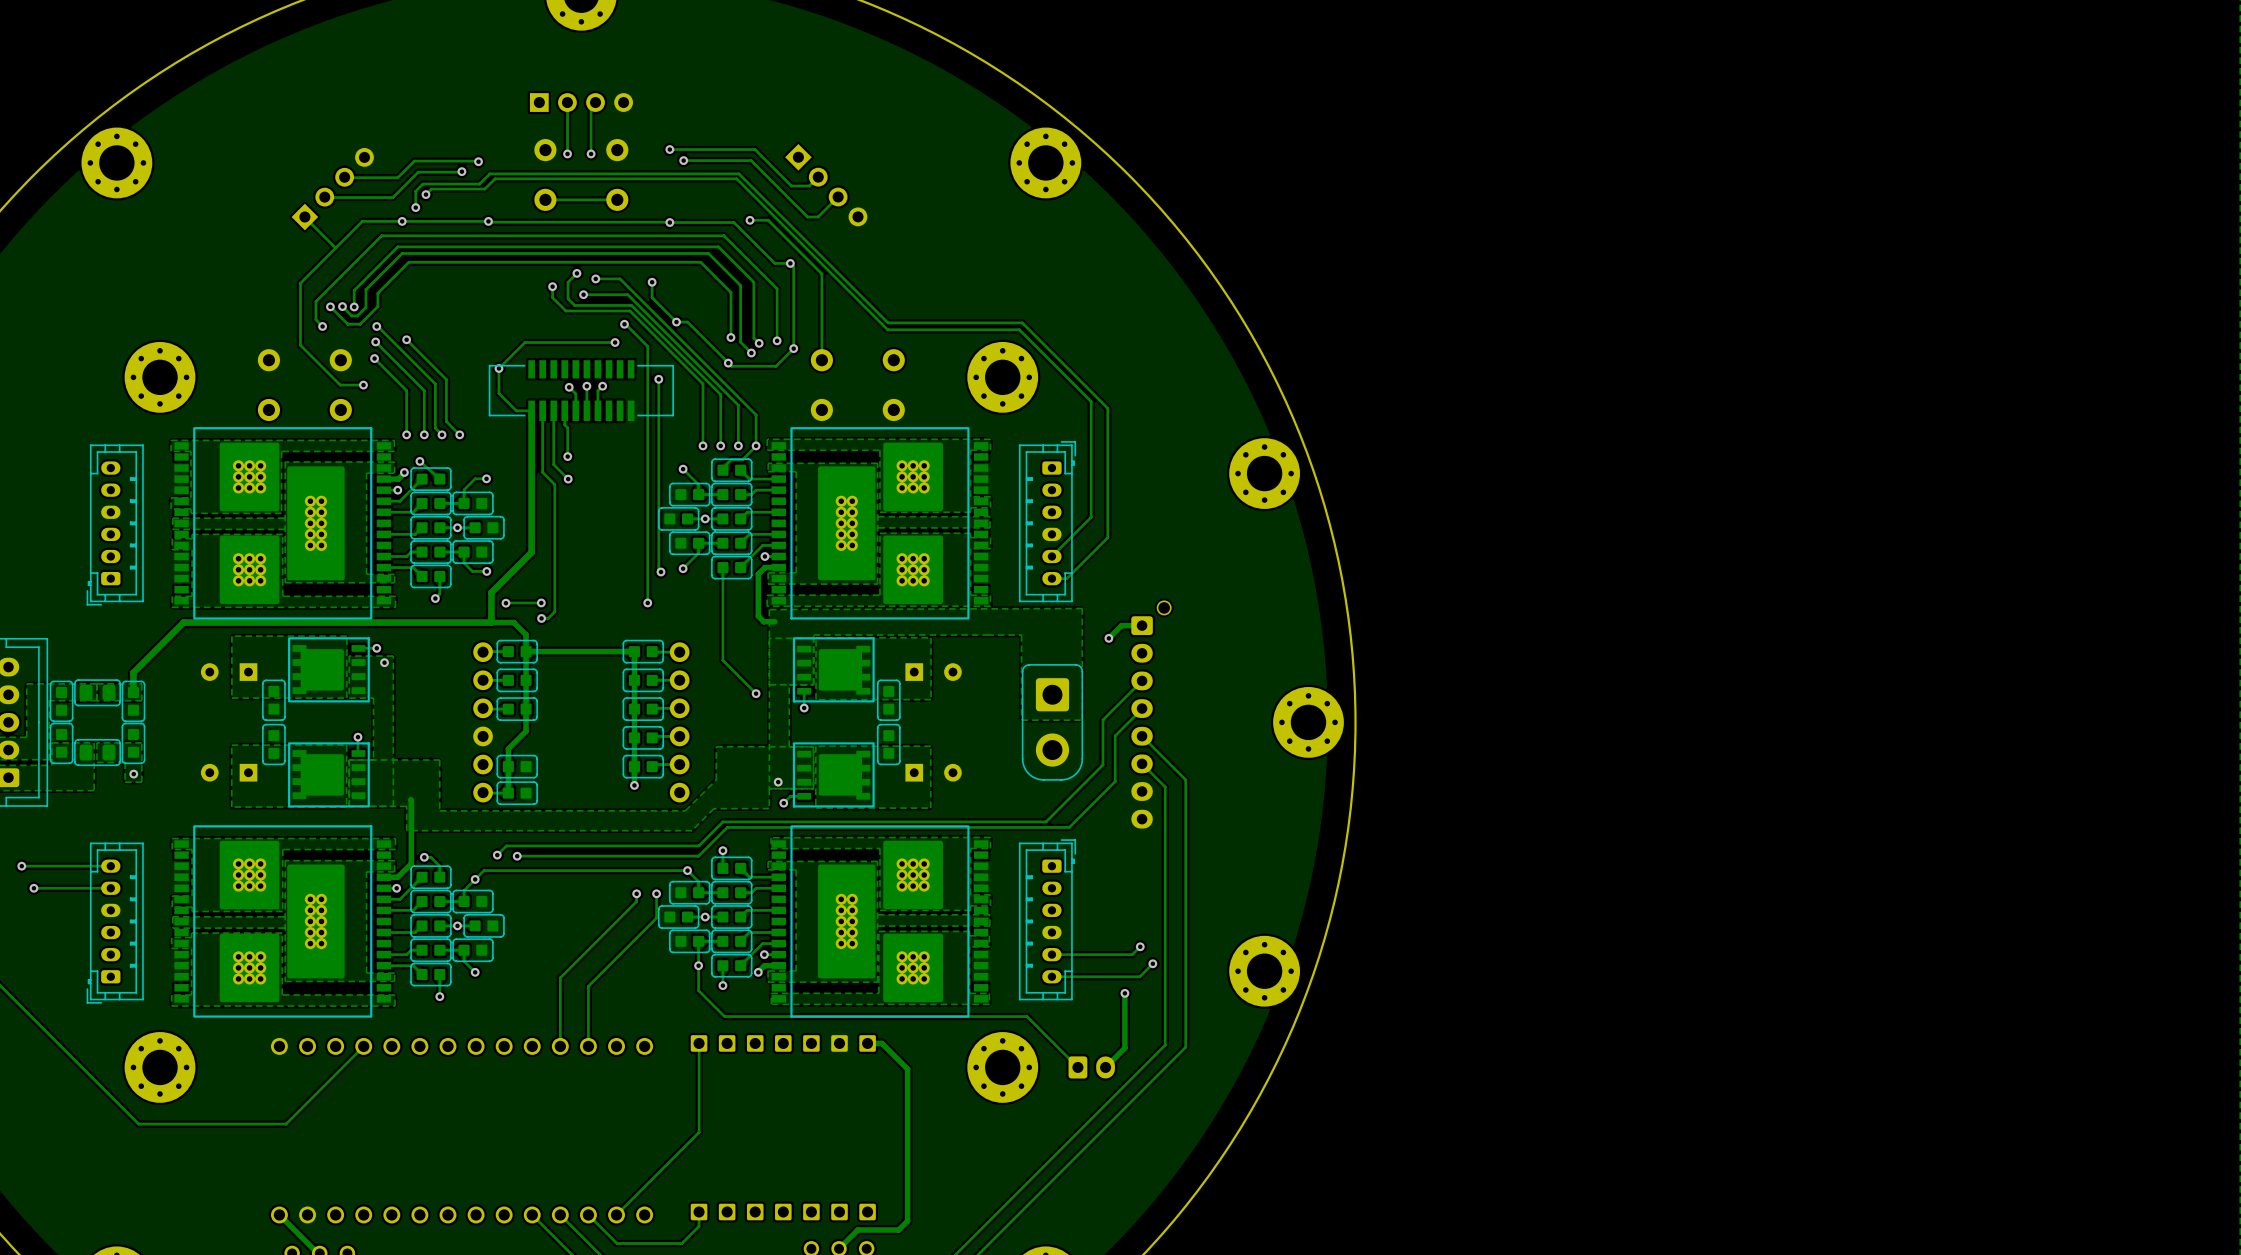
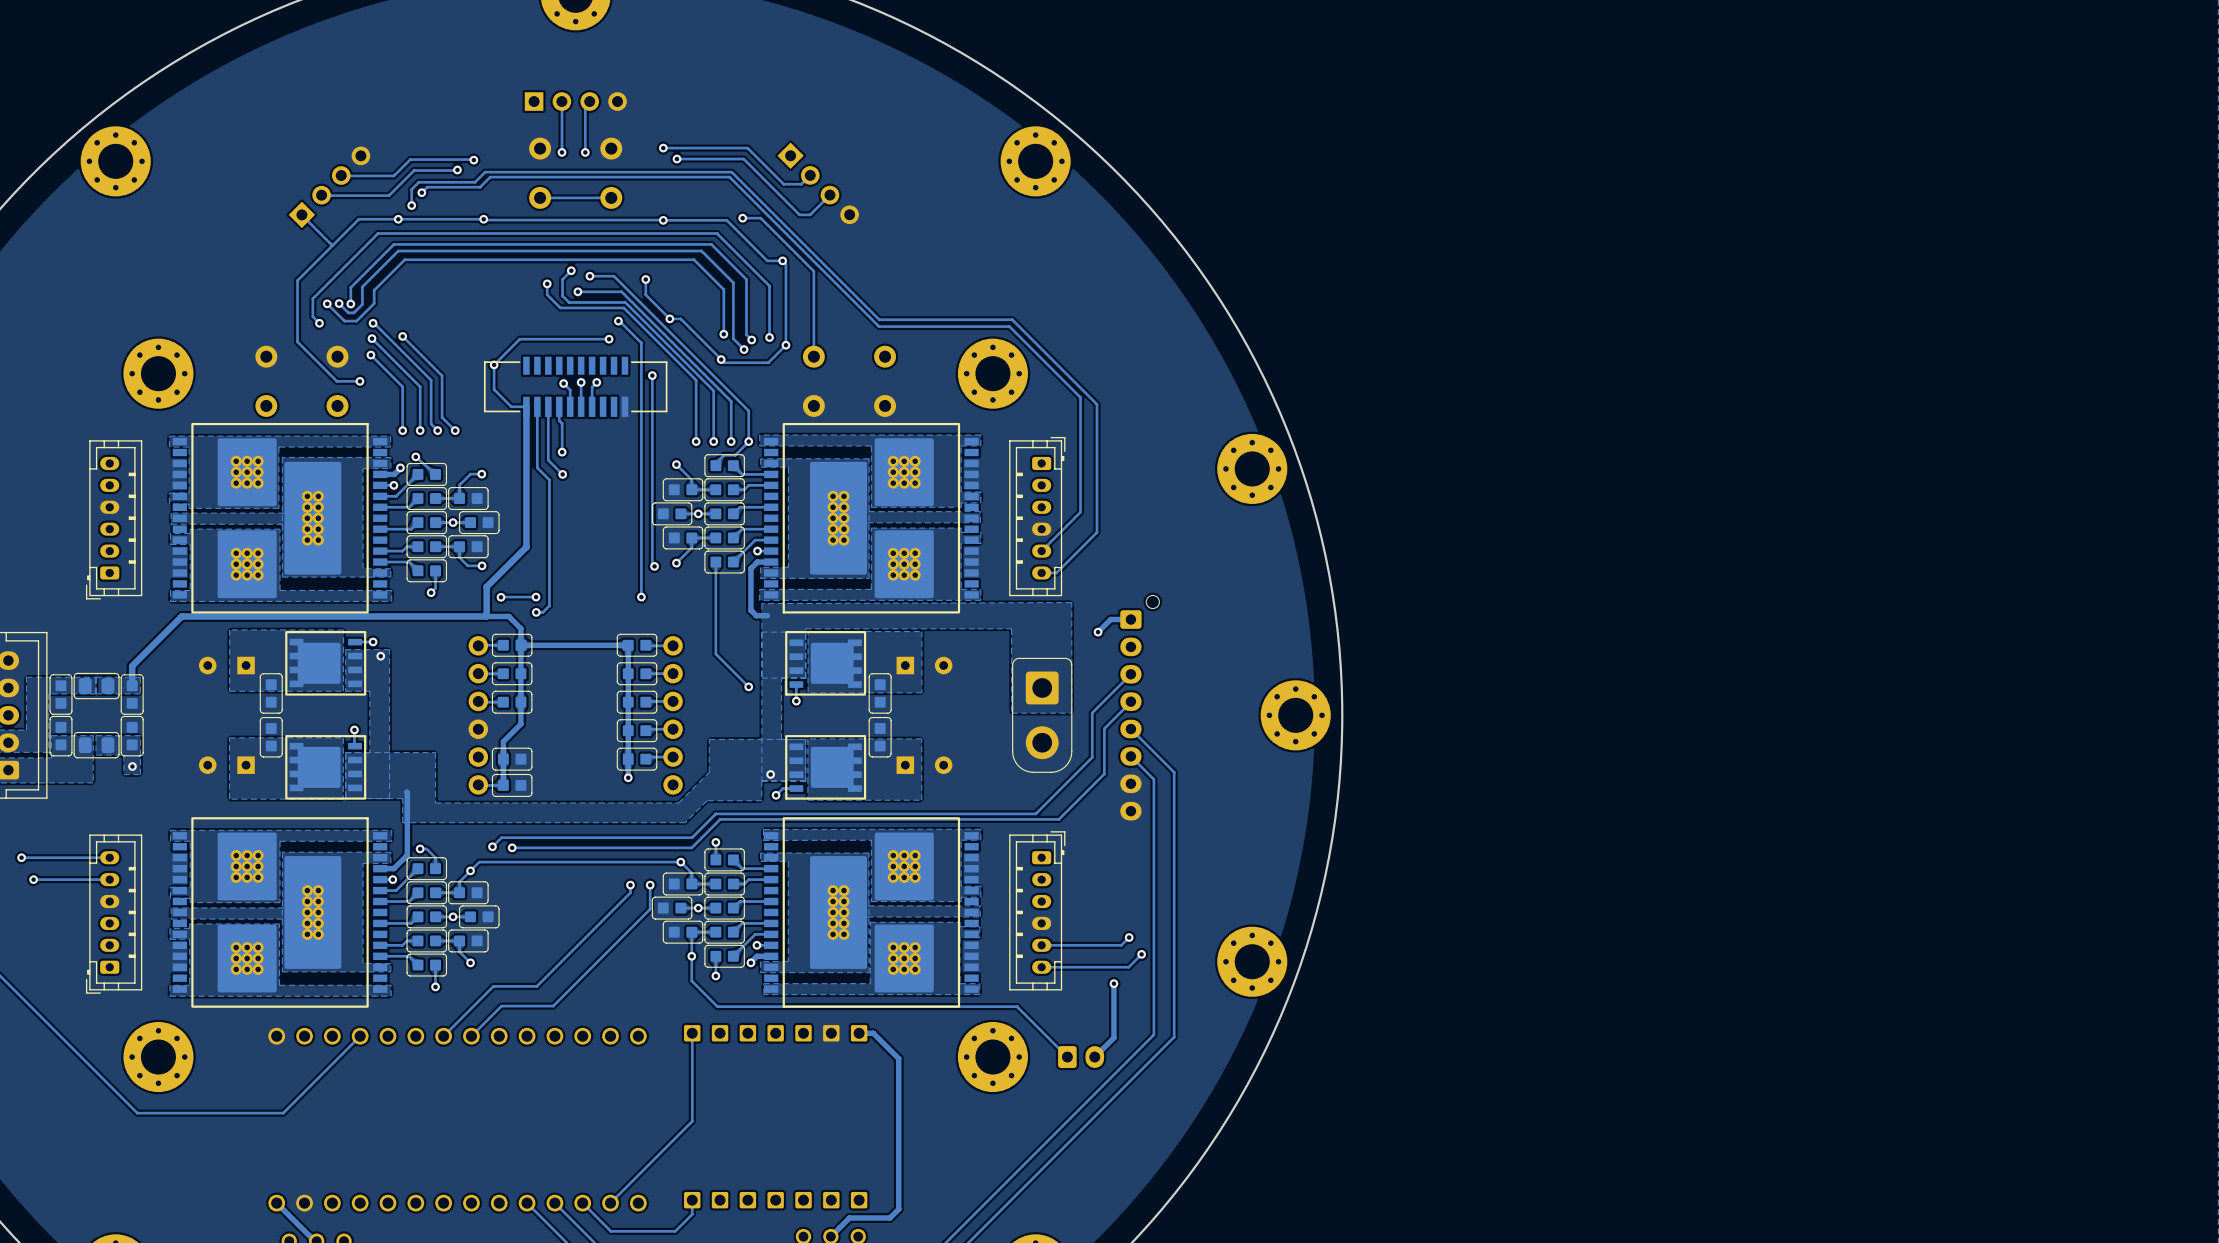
track: (560, 977) (560, 1046) -> (554, 968) (536, 986) (493, 986) (443, 1036)
track: (588, 986) (588, 1046) -> (582, 976) (553, 1006) (501, 1006) (471, 1036)

